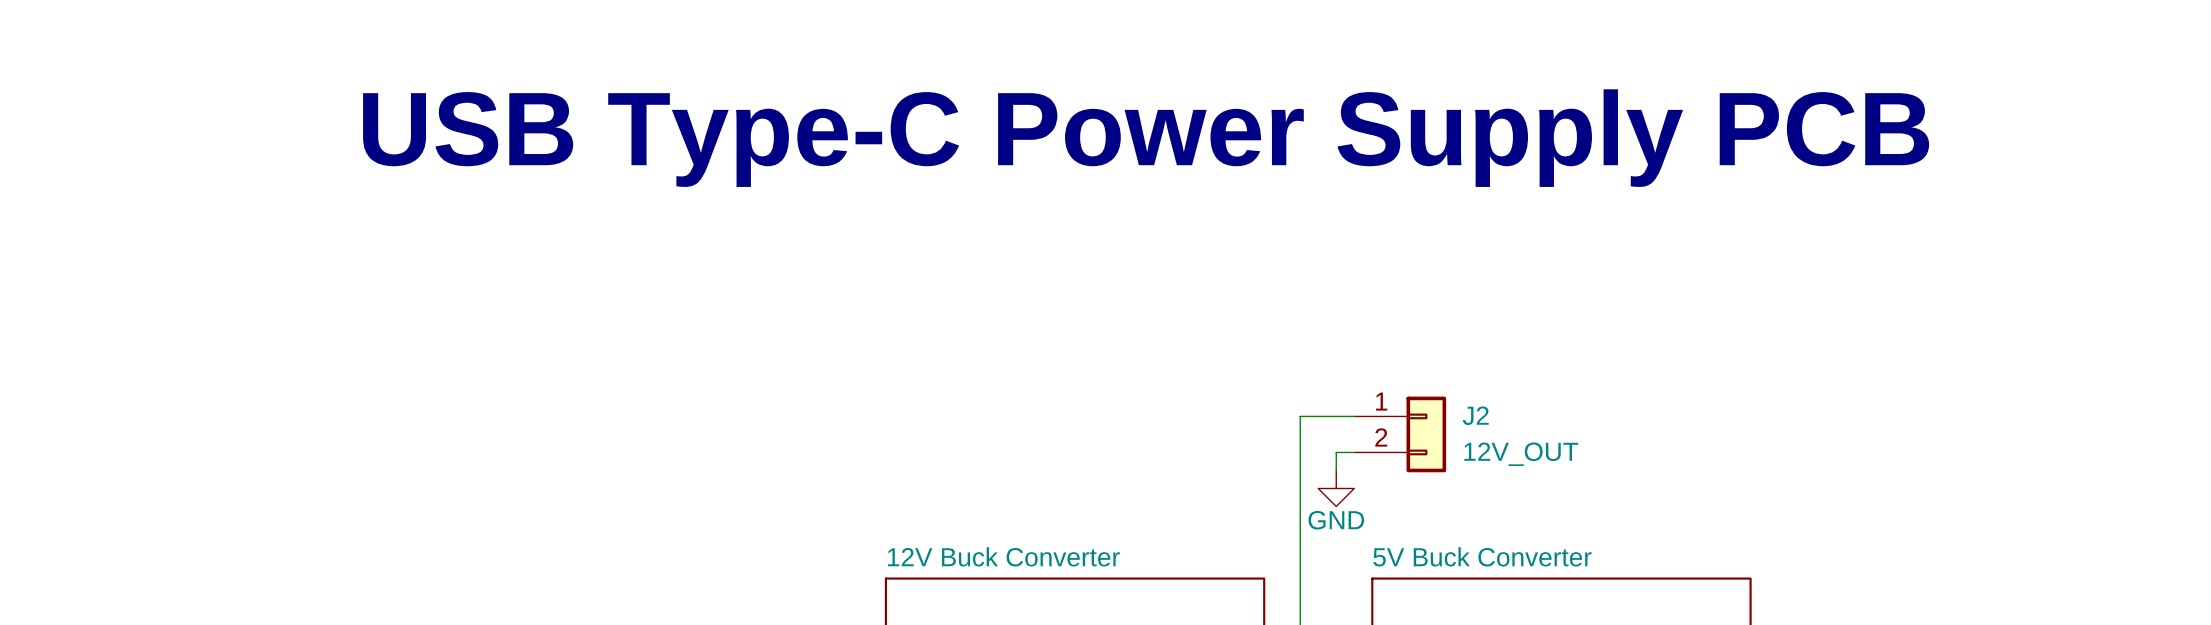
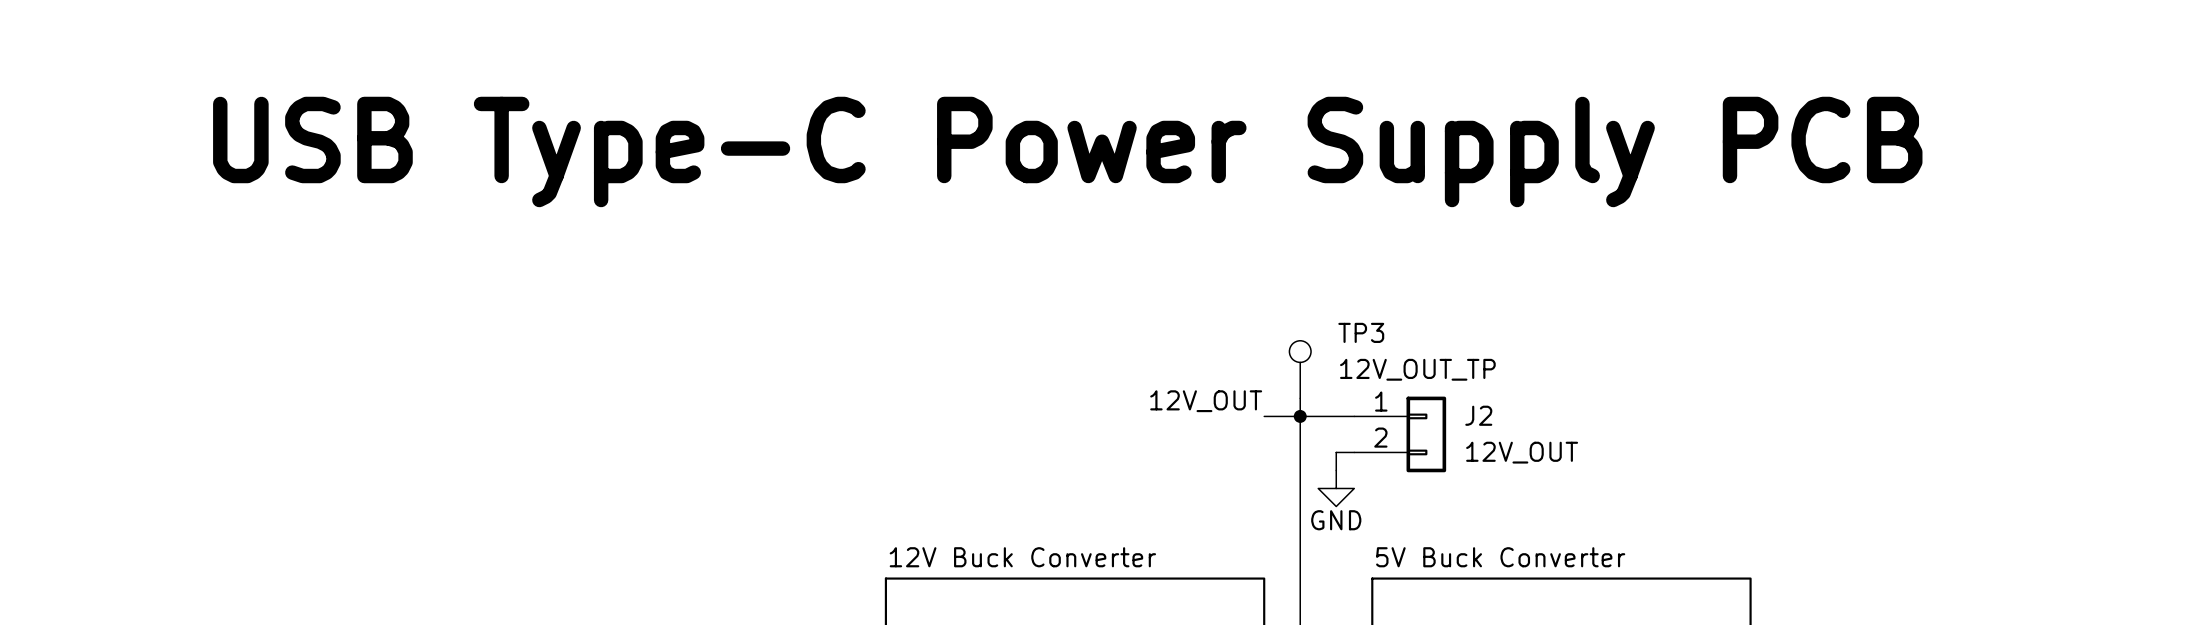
text position: USB Type-C Power Supply PCB (1146, 138) -> USB Type-C Power Supply PCB (1067, 151)
TP3: none -> 12V_OUT_TP (1300, 369)
wire: none -> (1300, 398) (1300, 416) (1264, 416)
label: none -> 12V_OUT (1206, 401)
junction: none -> (1300, 416)

